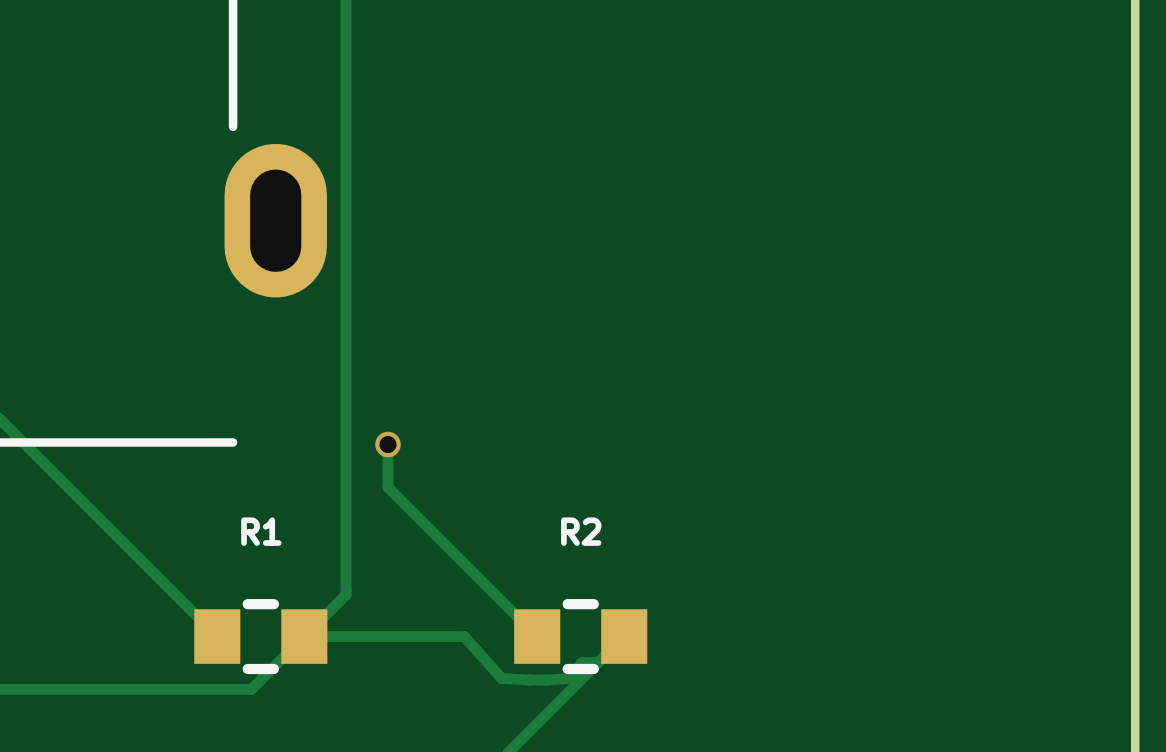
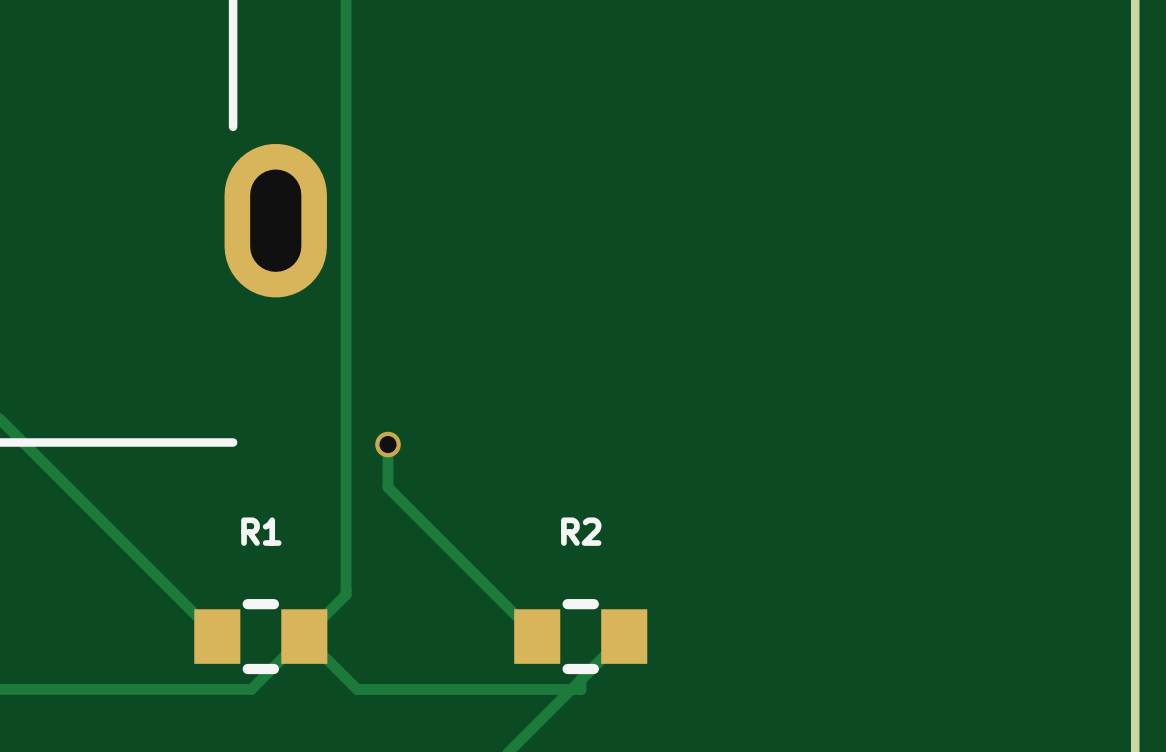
track: (304, 636) (464, 636) (501, 678) (529, 680) (568, 678) (582, 662) (598, 662) -> (304, 636) (357, 689) (580, 689) (580, 679)

